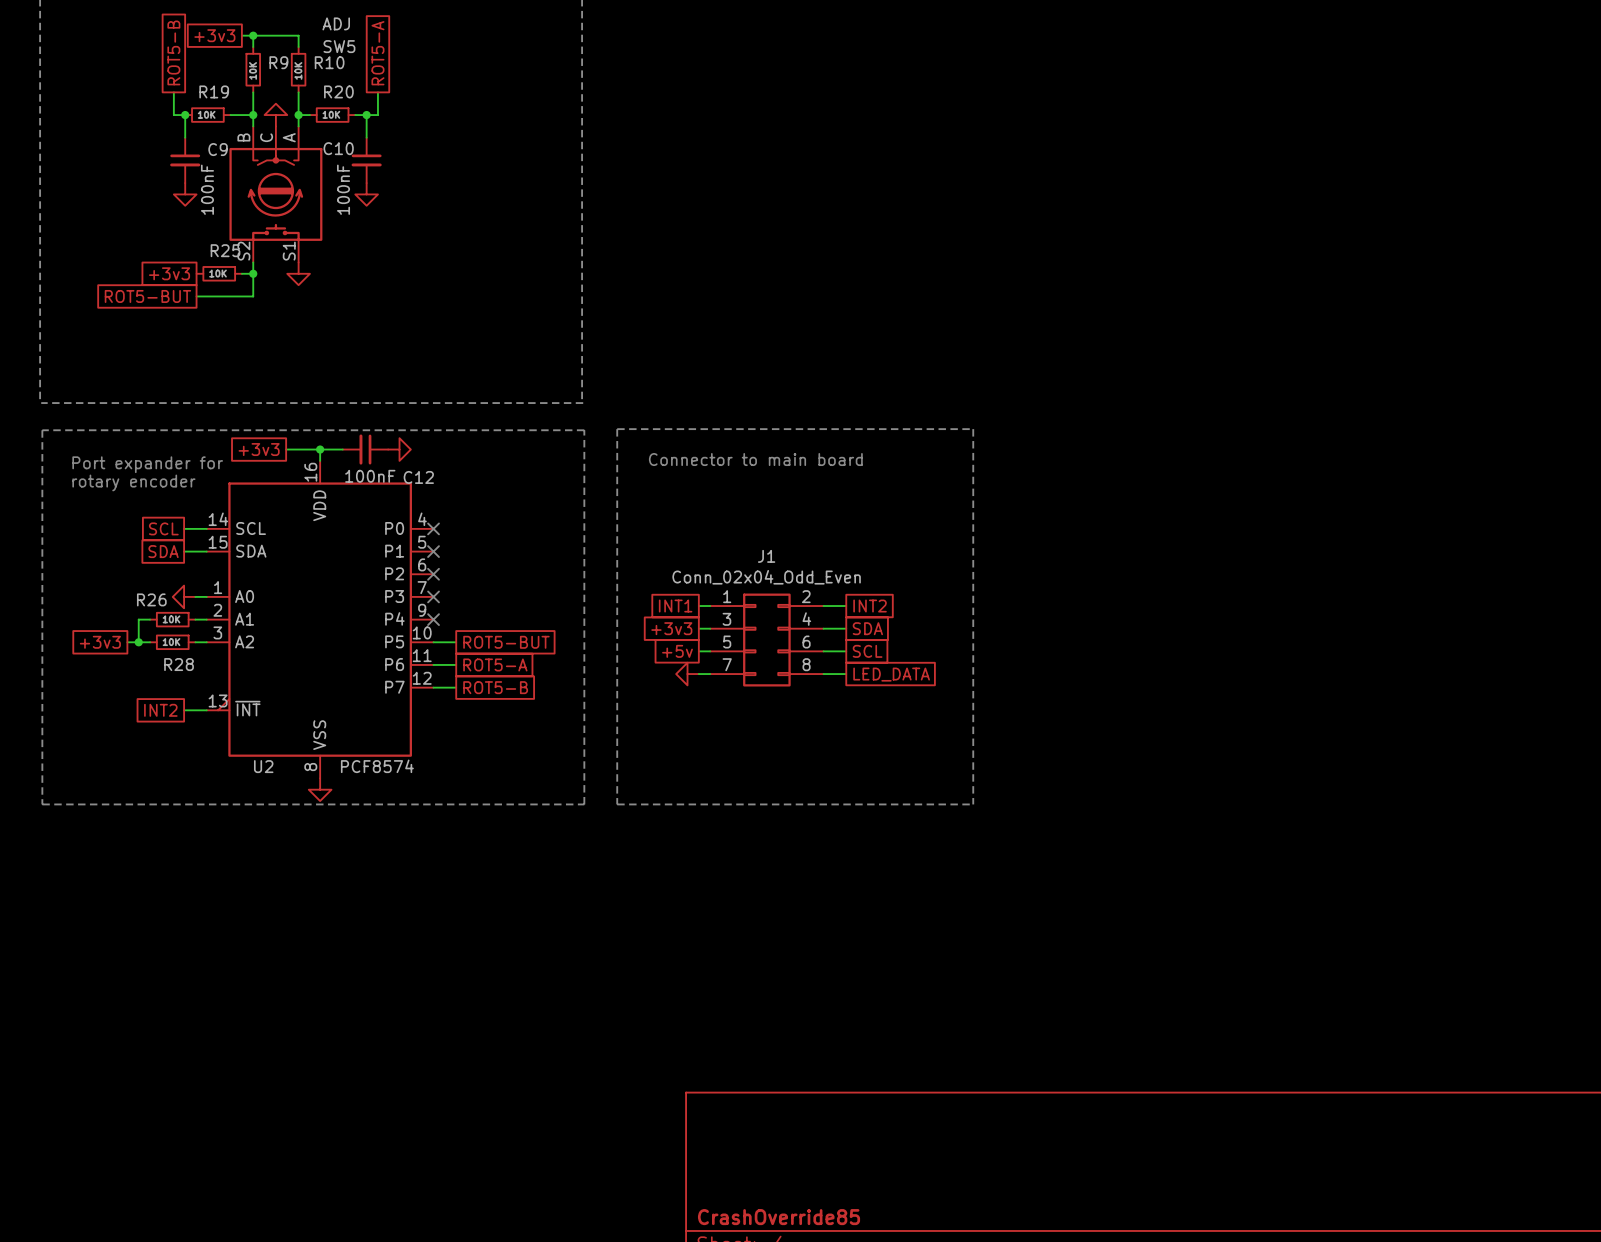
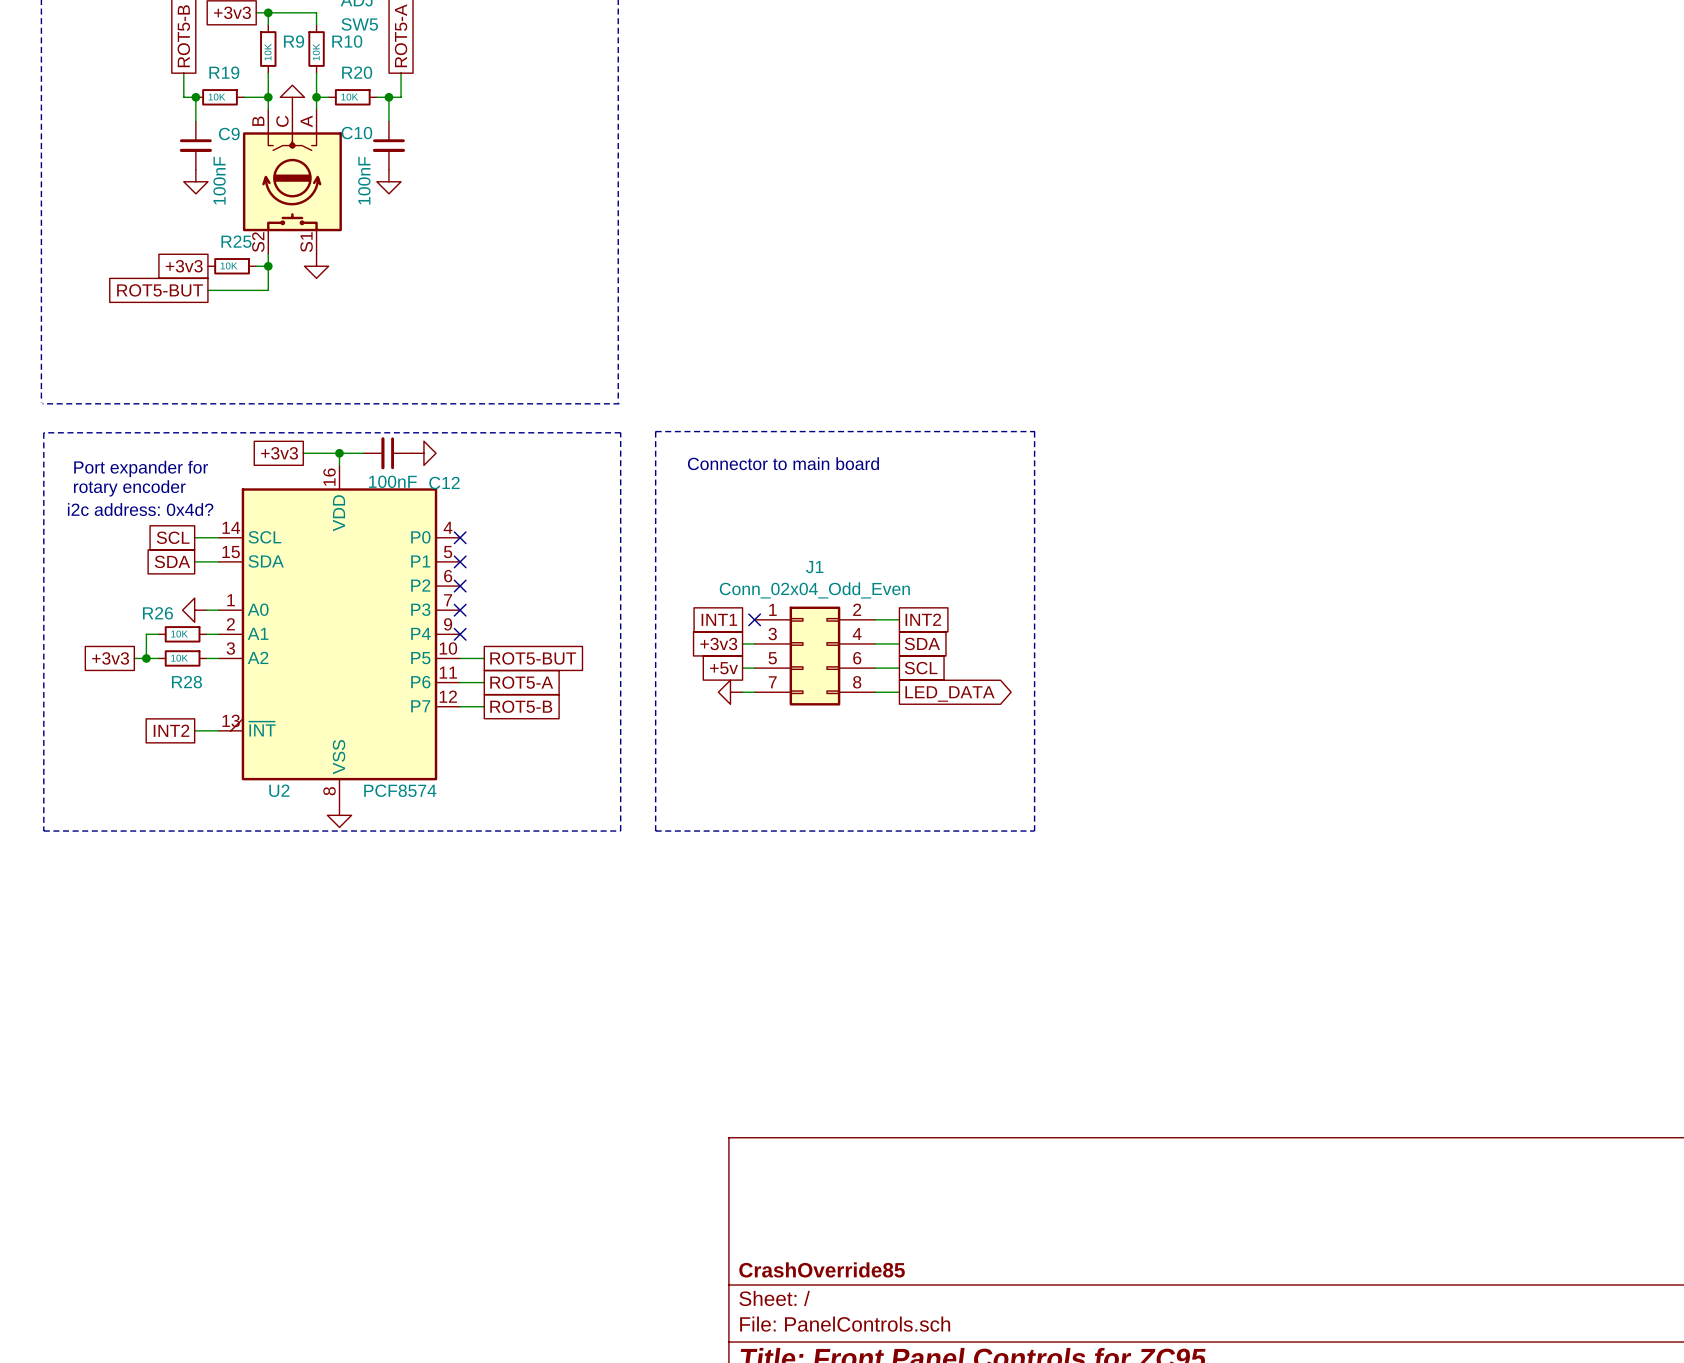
text: none -> i2c address: 0x4d? (140, 509)
wire: (698, 606) (710, 606) -> none
no-connect mark: none -> (754, 619)
global label shape: passive (891, 674) -> output (949, 693)

